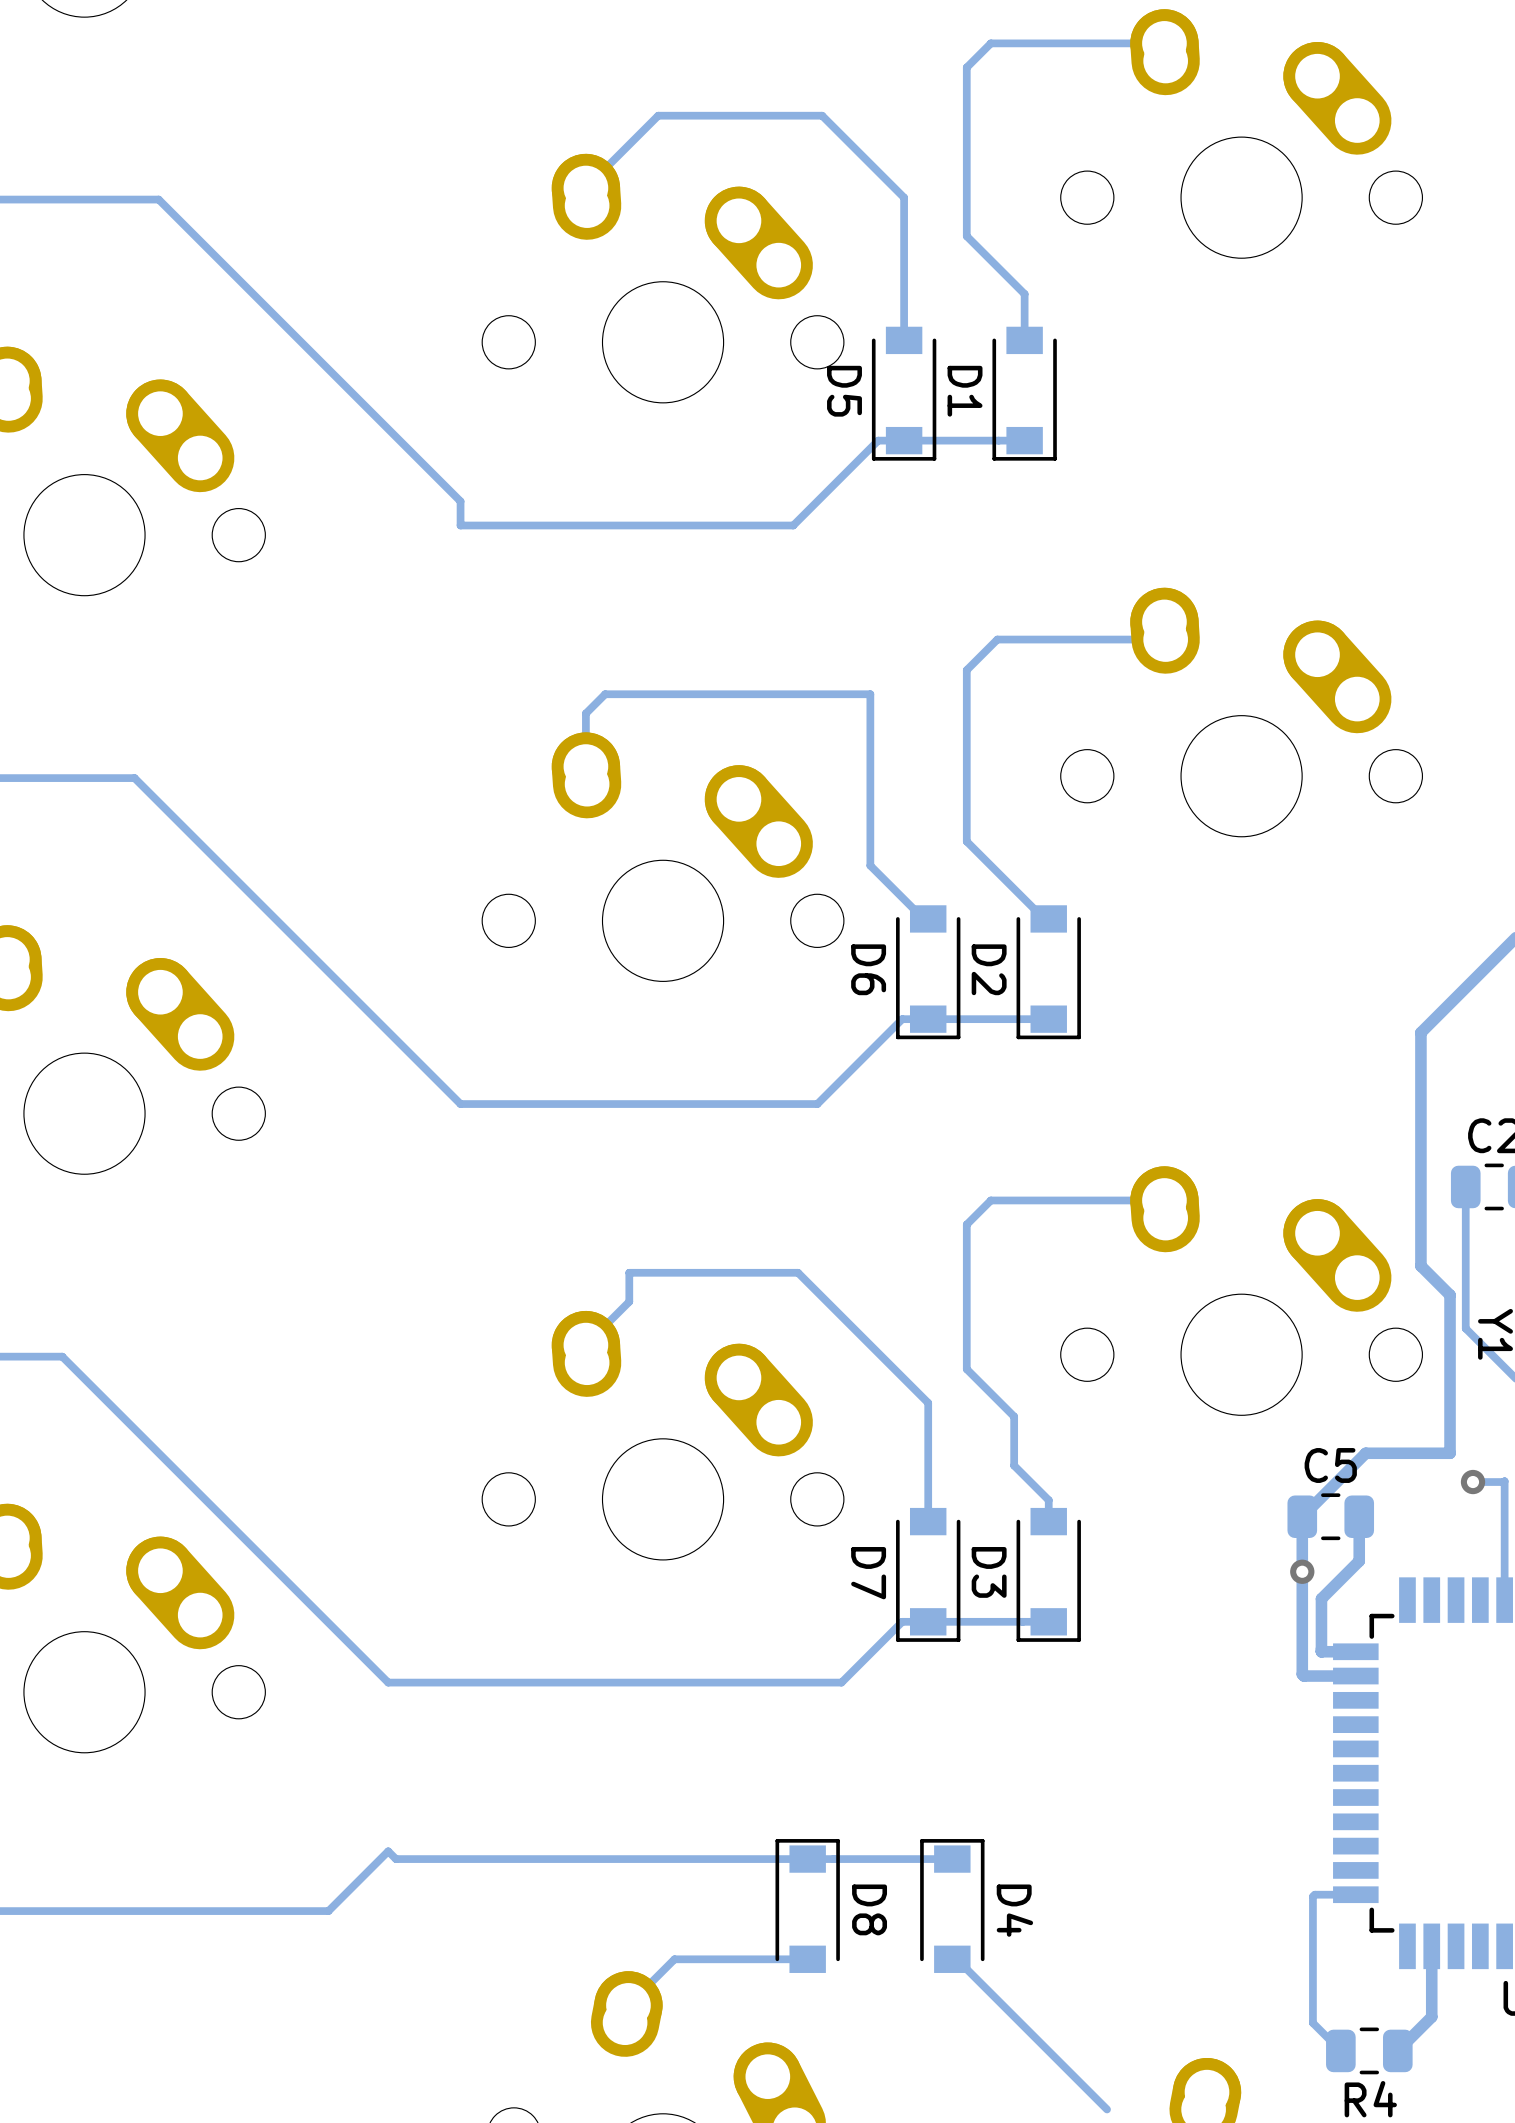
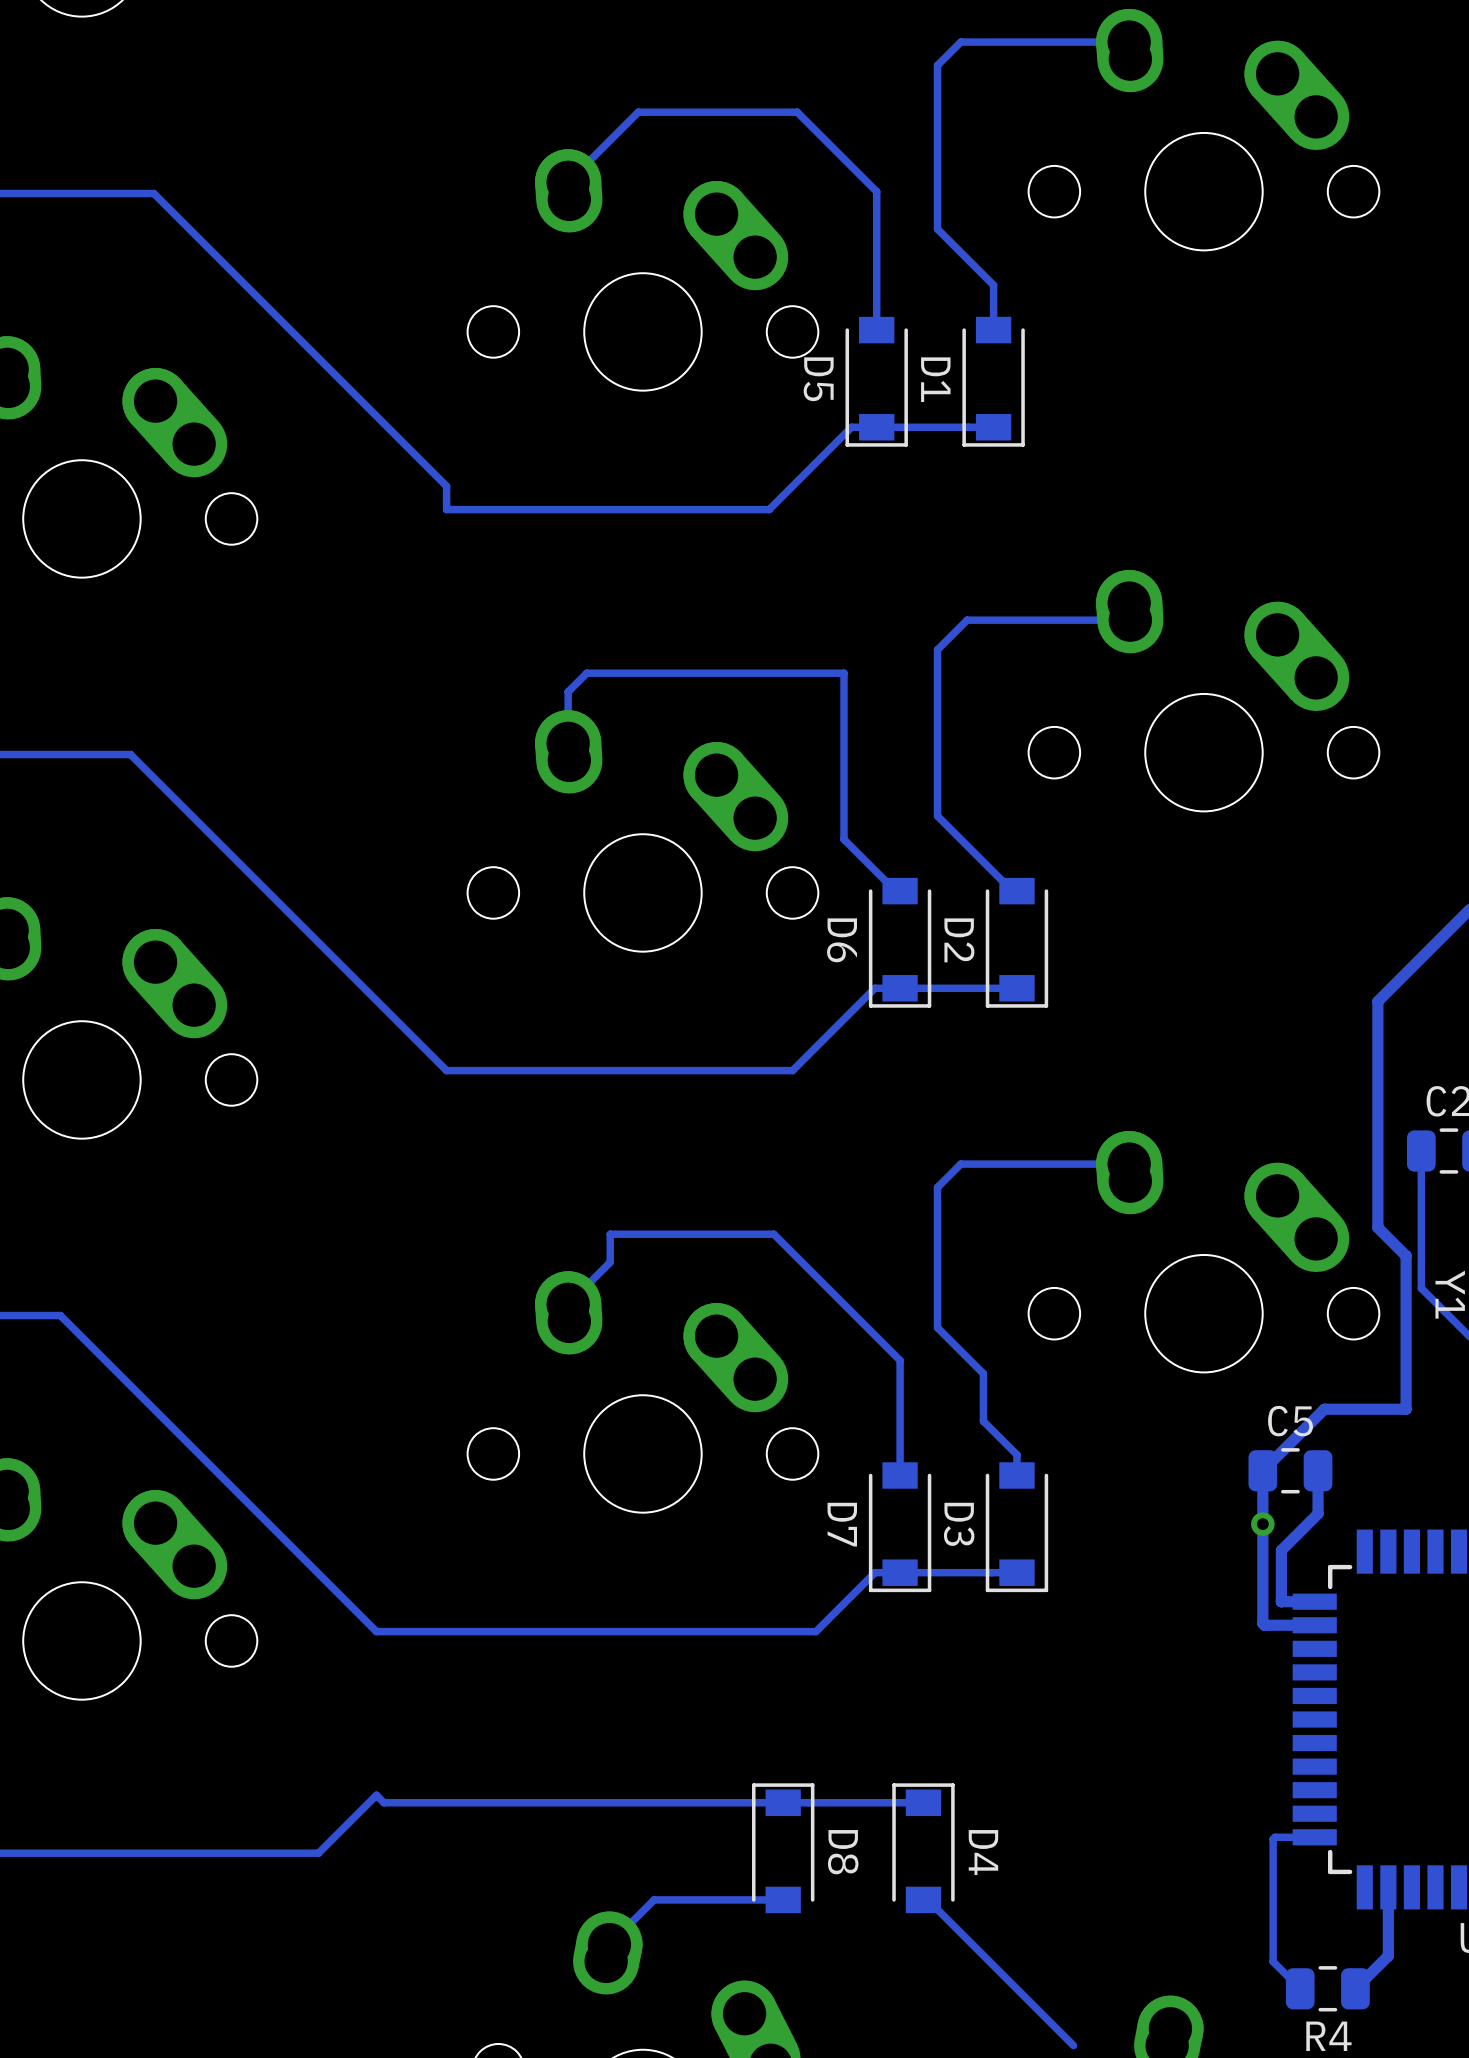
track: (1473, 1482) (1504, 1481) (1504, 1600) -> none
via: (1473, 1482) -> none

